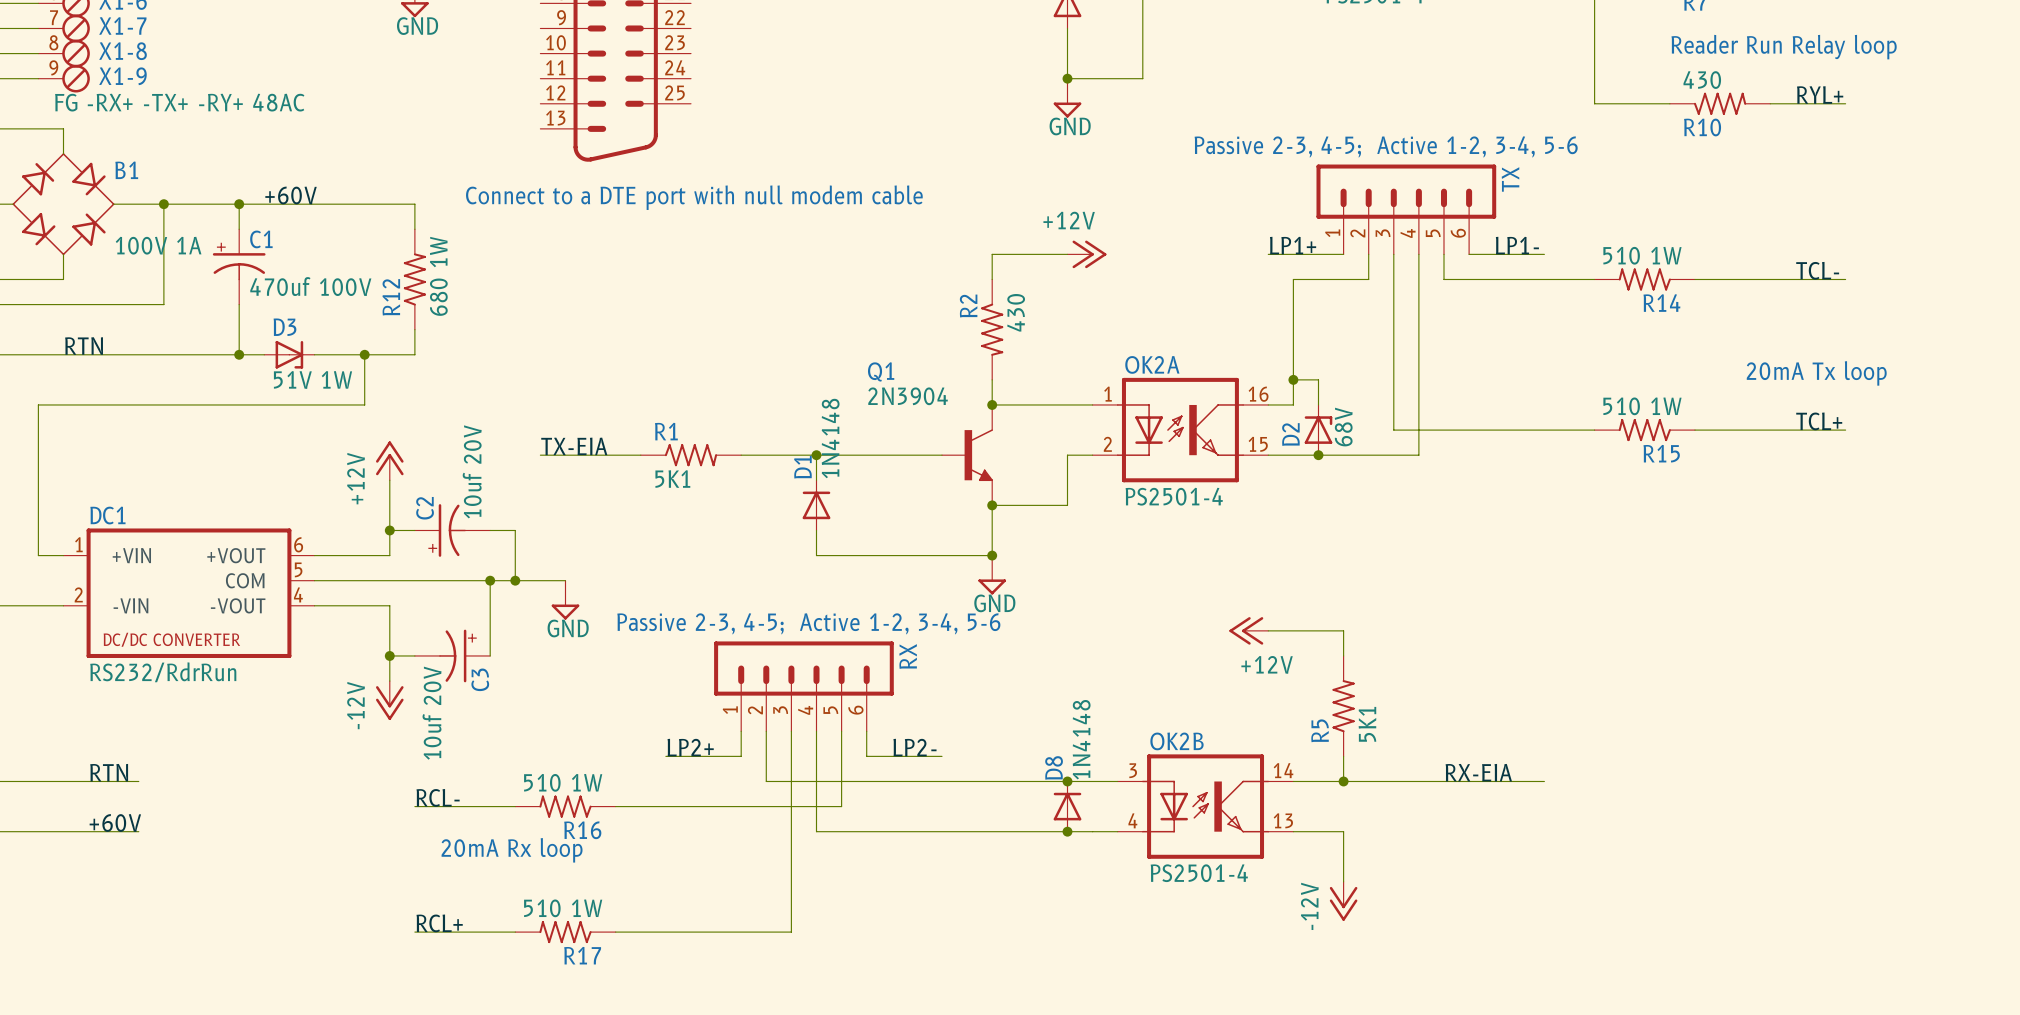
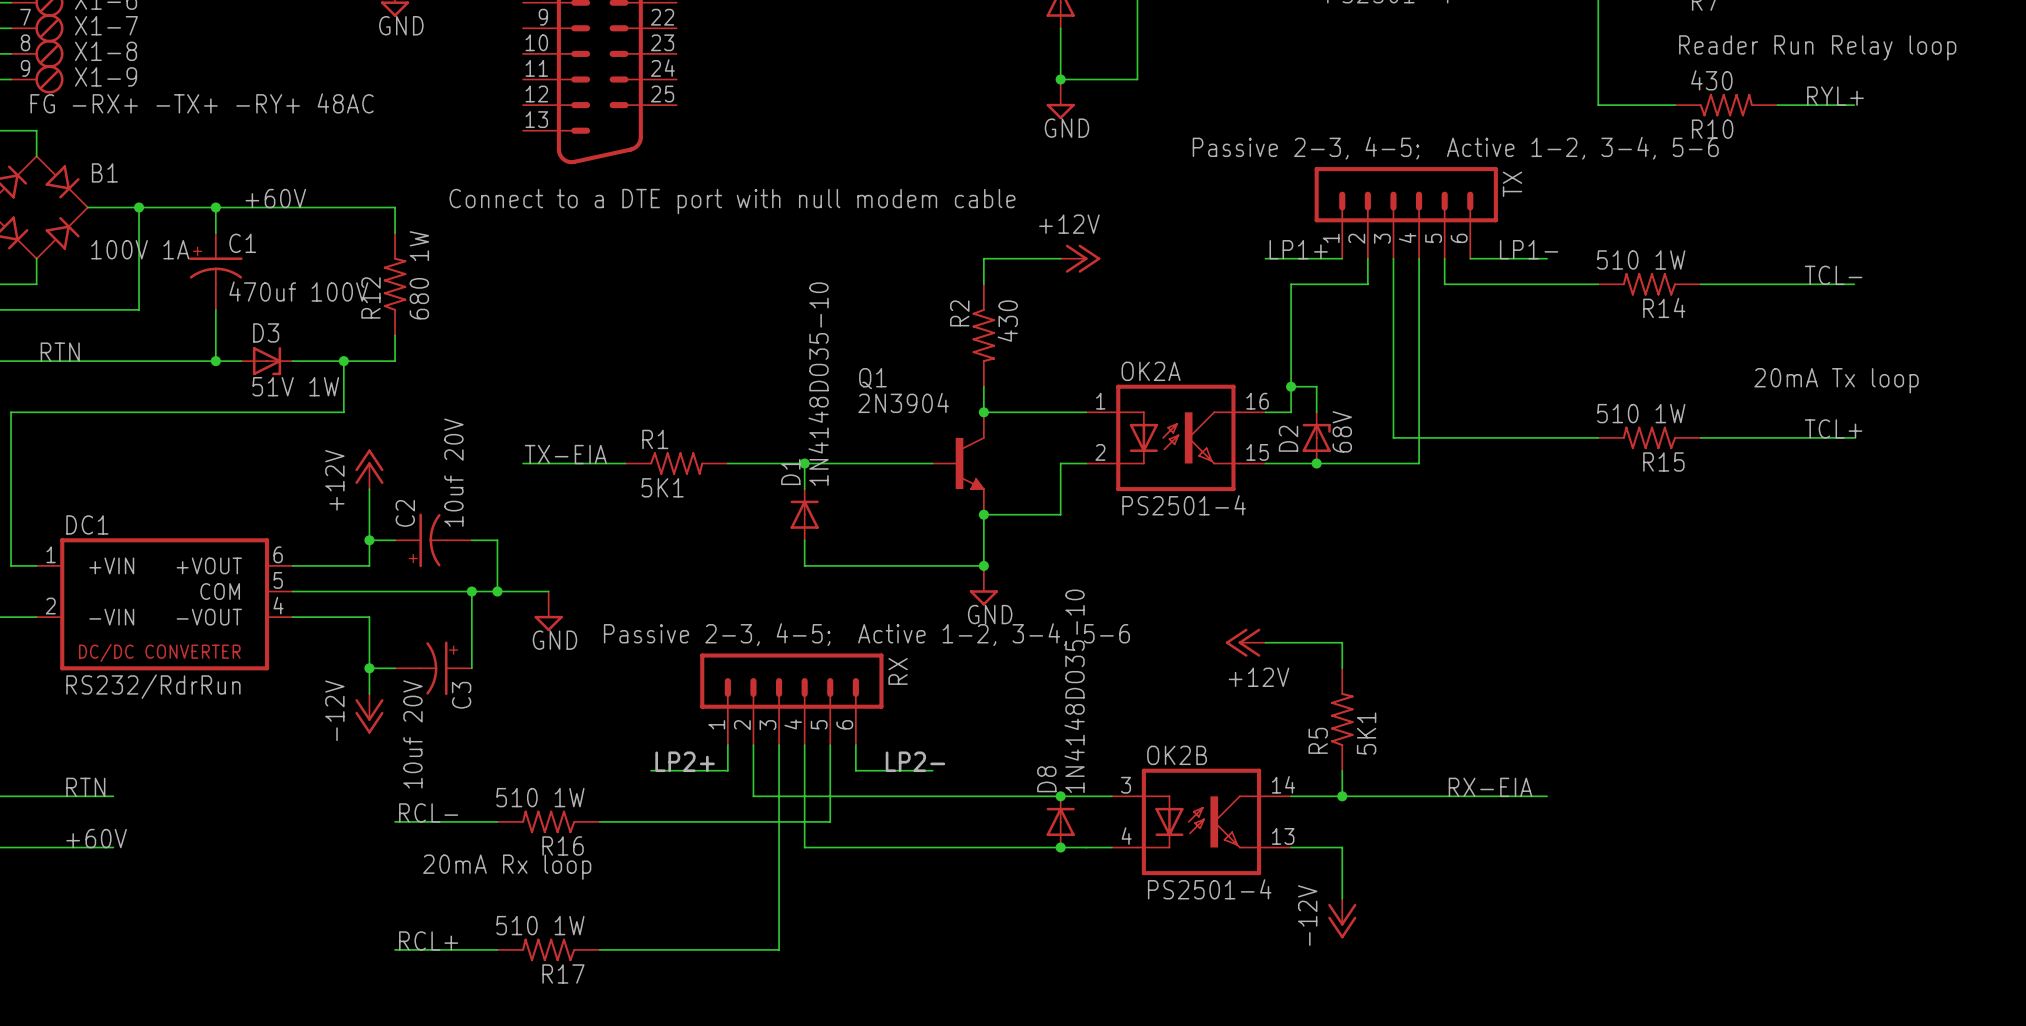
D1 value: 1N4148 (830, 438) -> 1N4148DO35-10 (818, 384)
D8 value: 1N4148 (1081, 739) -> 1N4148DO35-10 (1074, 691)

